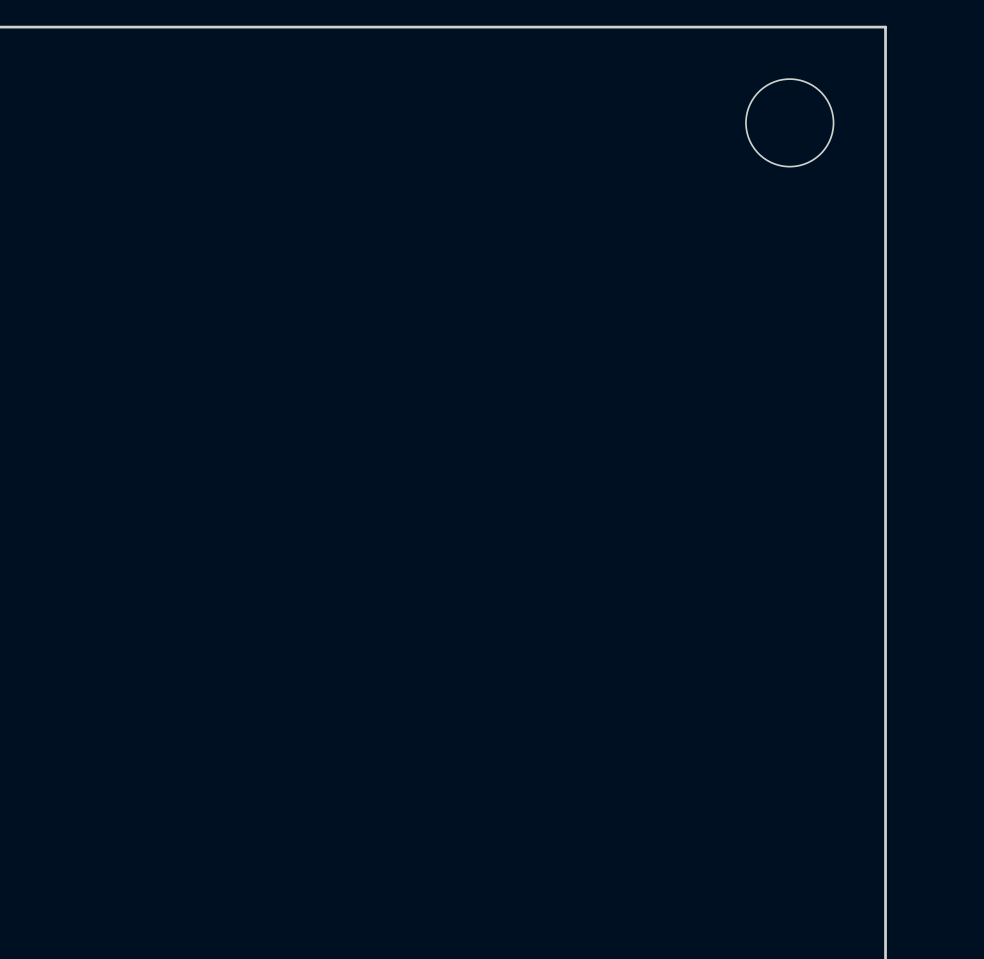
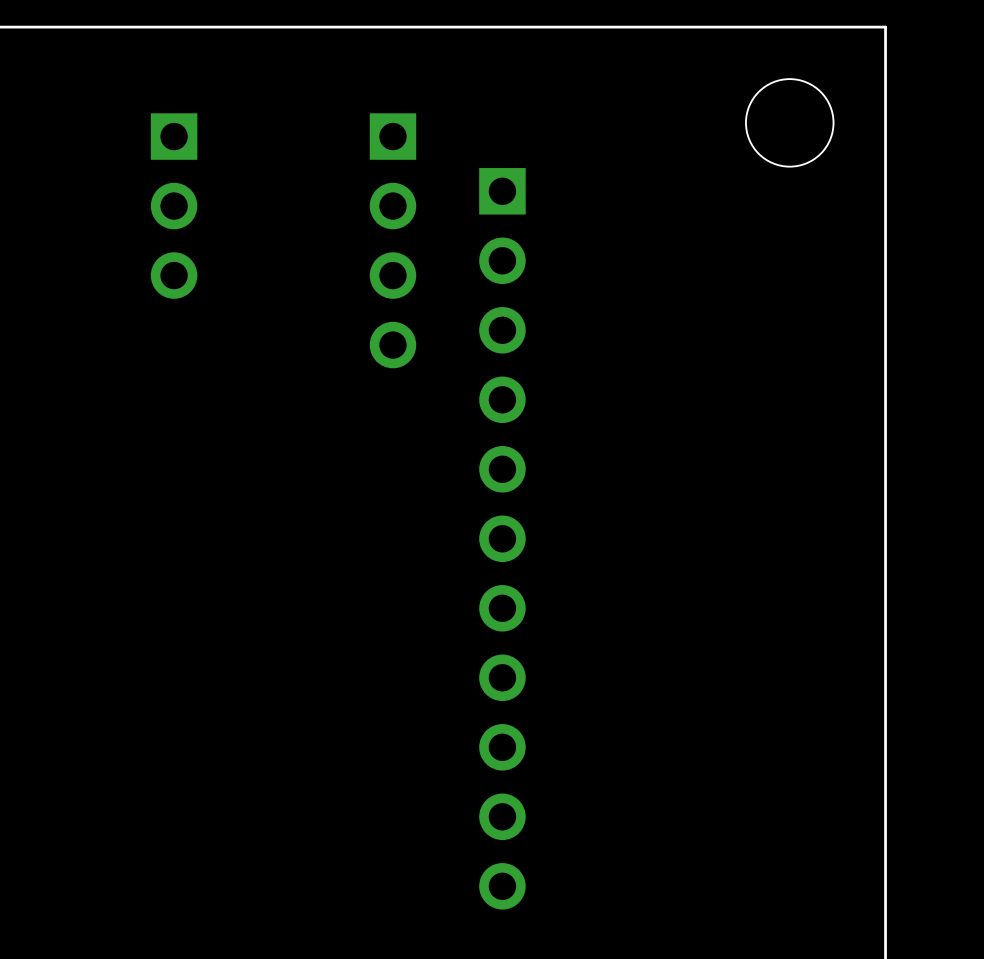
part: none -> (174, 206)
part: none -> (392, 240)
part: none -> (502, 538)

